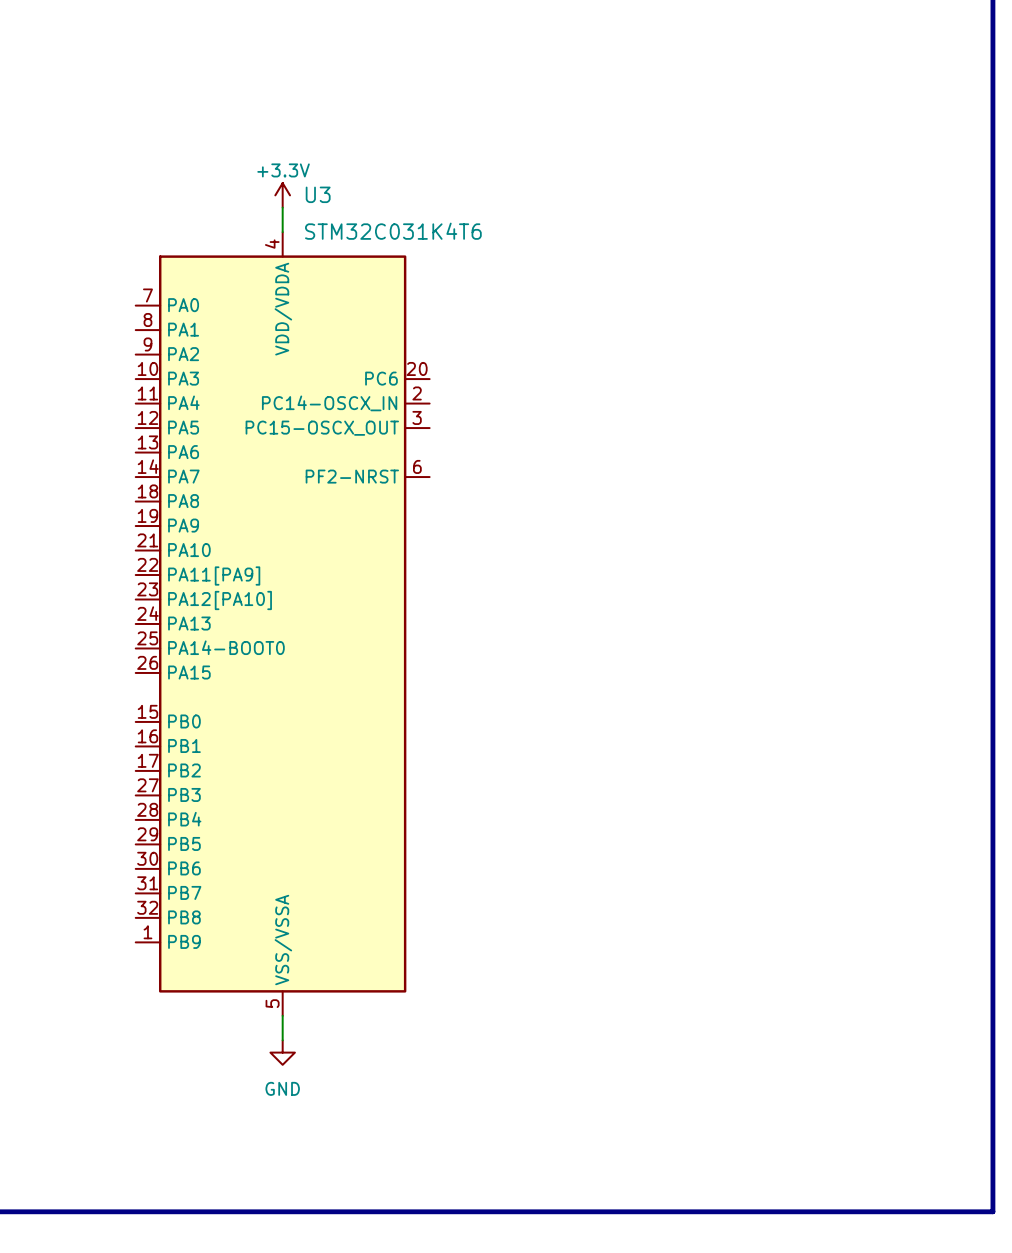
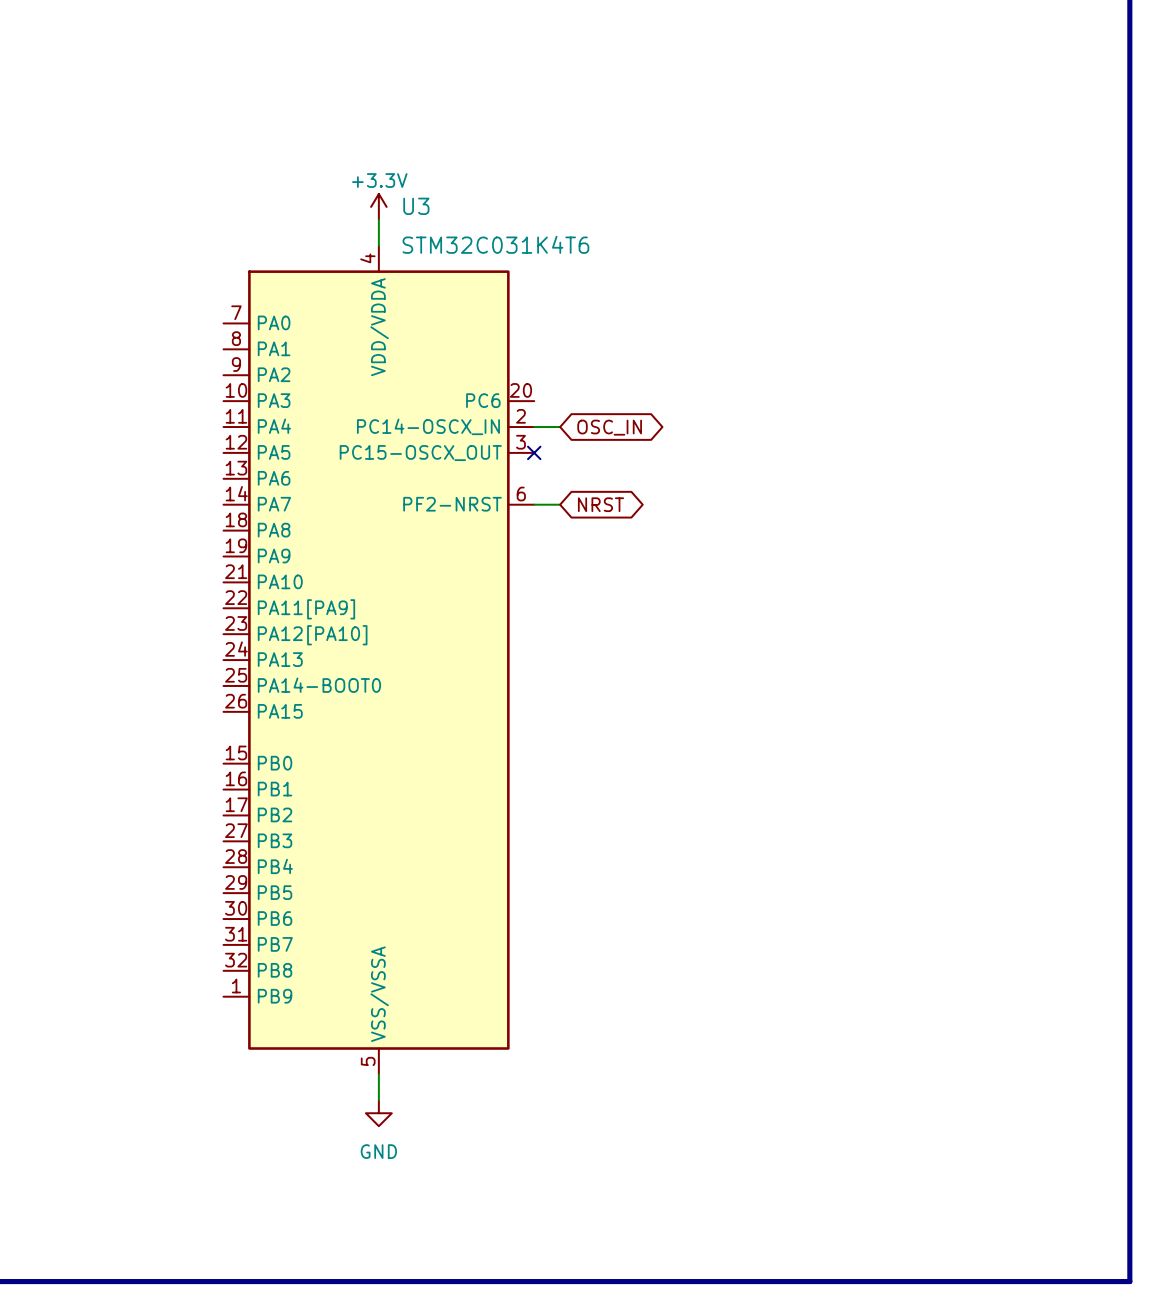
wire: none -> (534, 427) (560, 427)
global label: none -> OSC_IN (609, 427)
no-connect mark: none -> (534, 452)
wire: none -> (534, 504) (560, 504)
global label: none -> NRST (601, 504)

